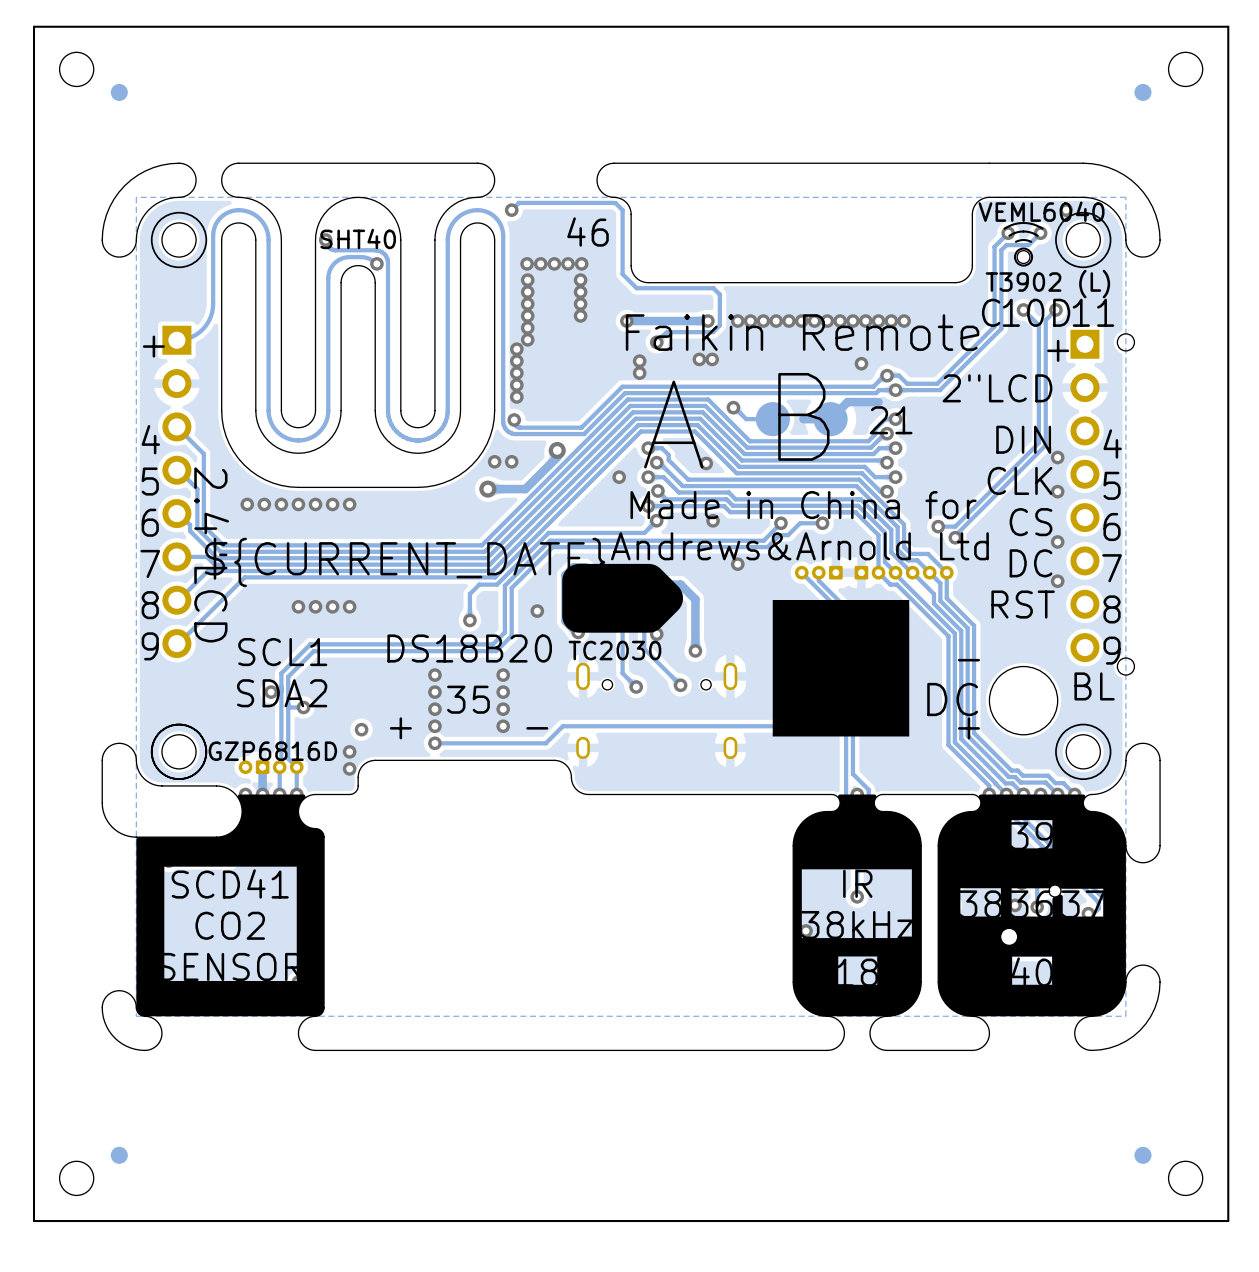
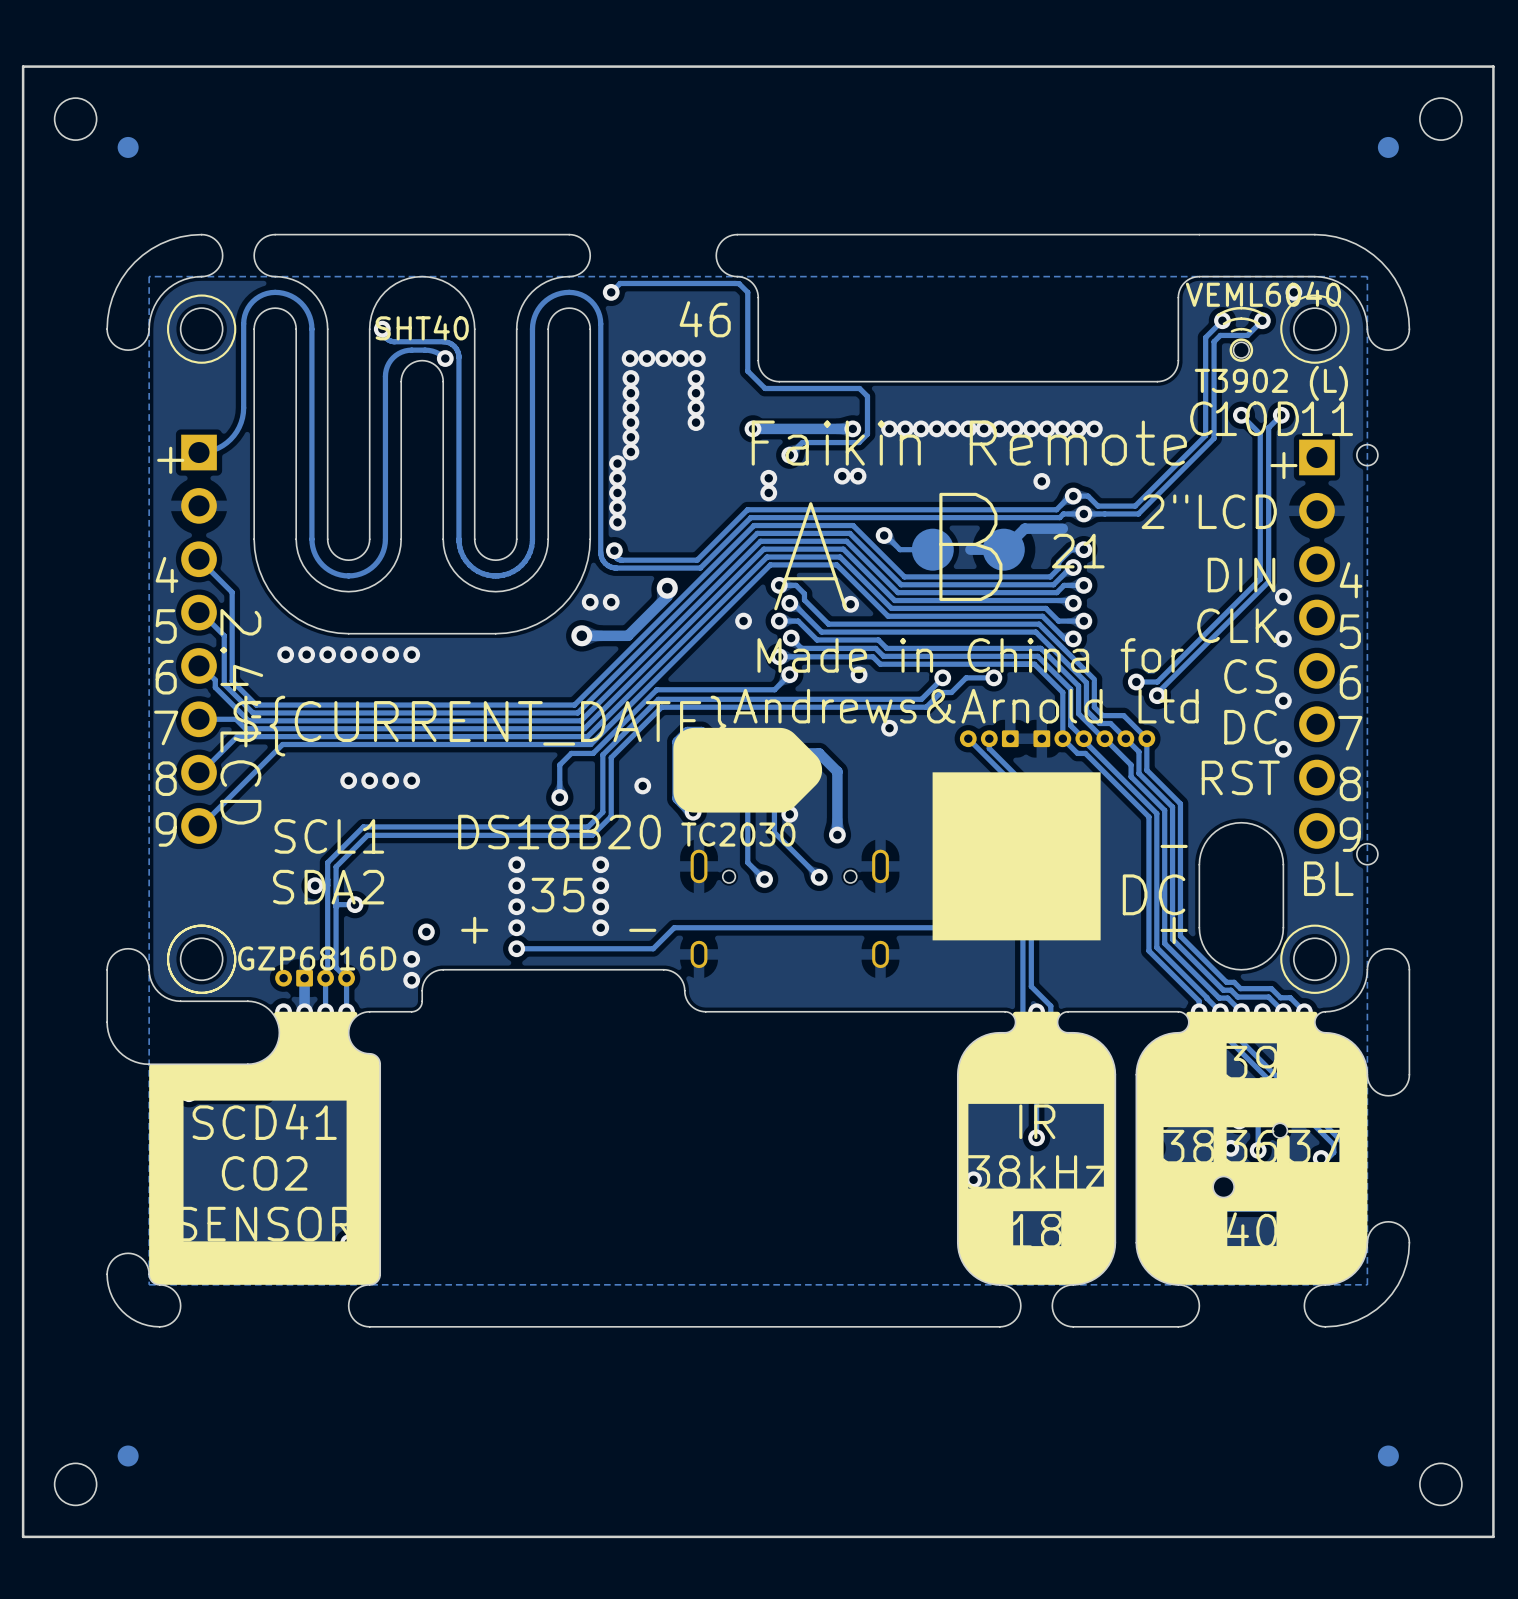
round board edge: [989, 666, 1059, 736] -> none
board edge: none -> (1283, 864) (1283, 933) (1277, 948) (1266, 961) (1252, 968) (1235, 969) (1220, 964) (1204, 948) (1199, 933) (1199, 864) (1204, 843) (1215, 831) (1225, 825) (1241, 822) (1252, 824) (1262, 828) (1274, 839) (1280, 848) (1283, 864)

